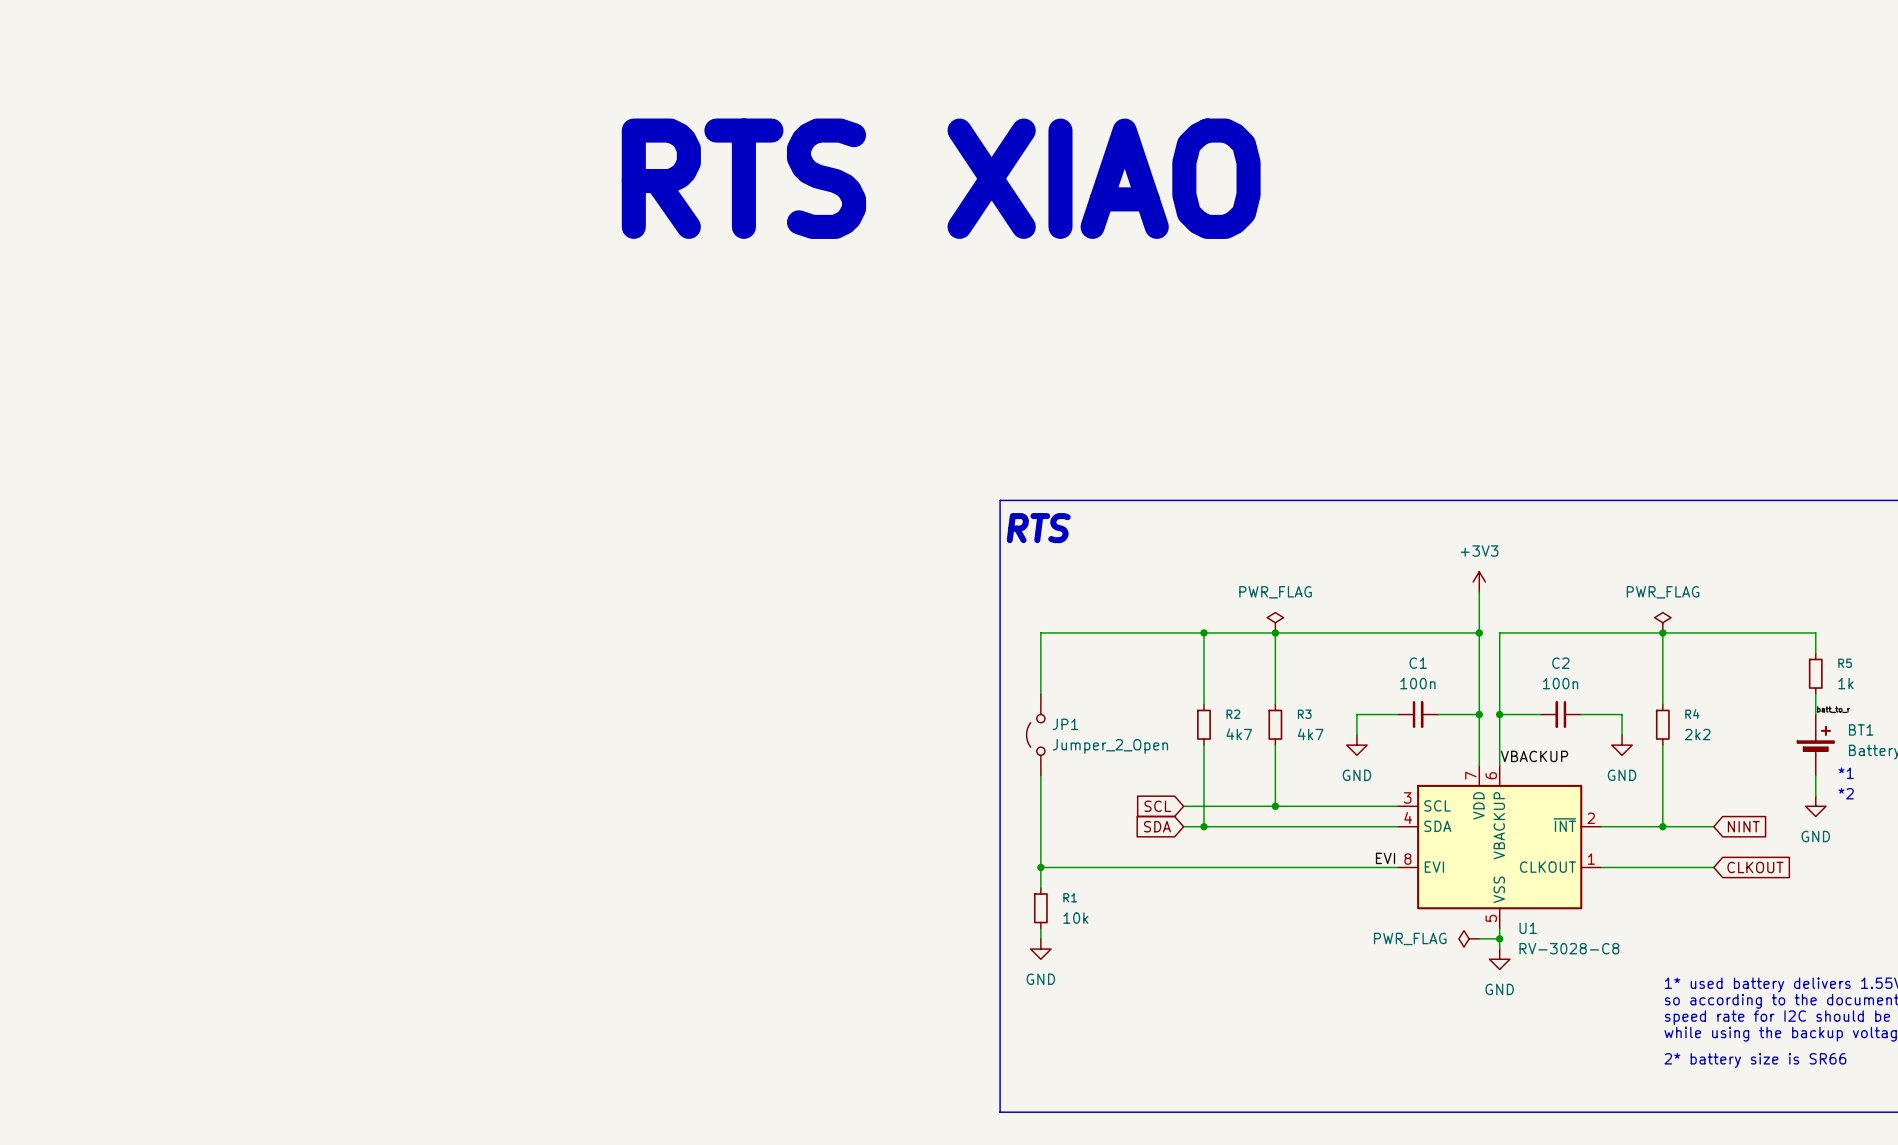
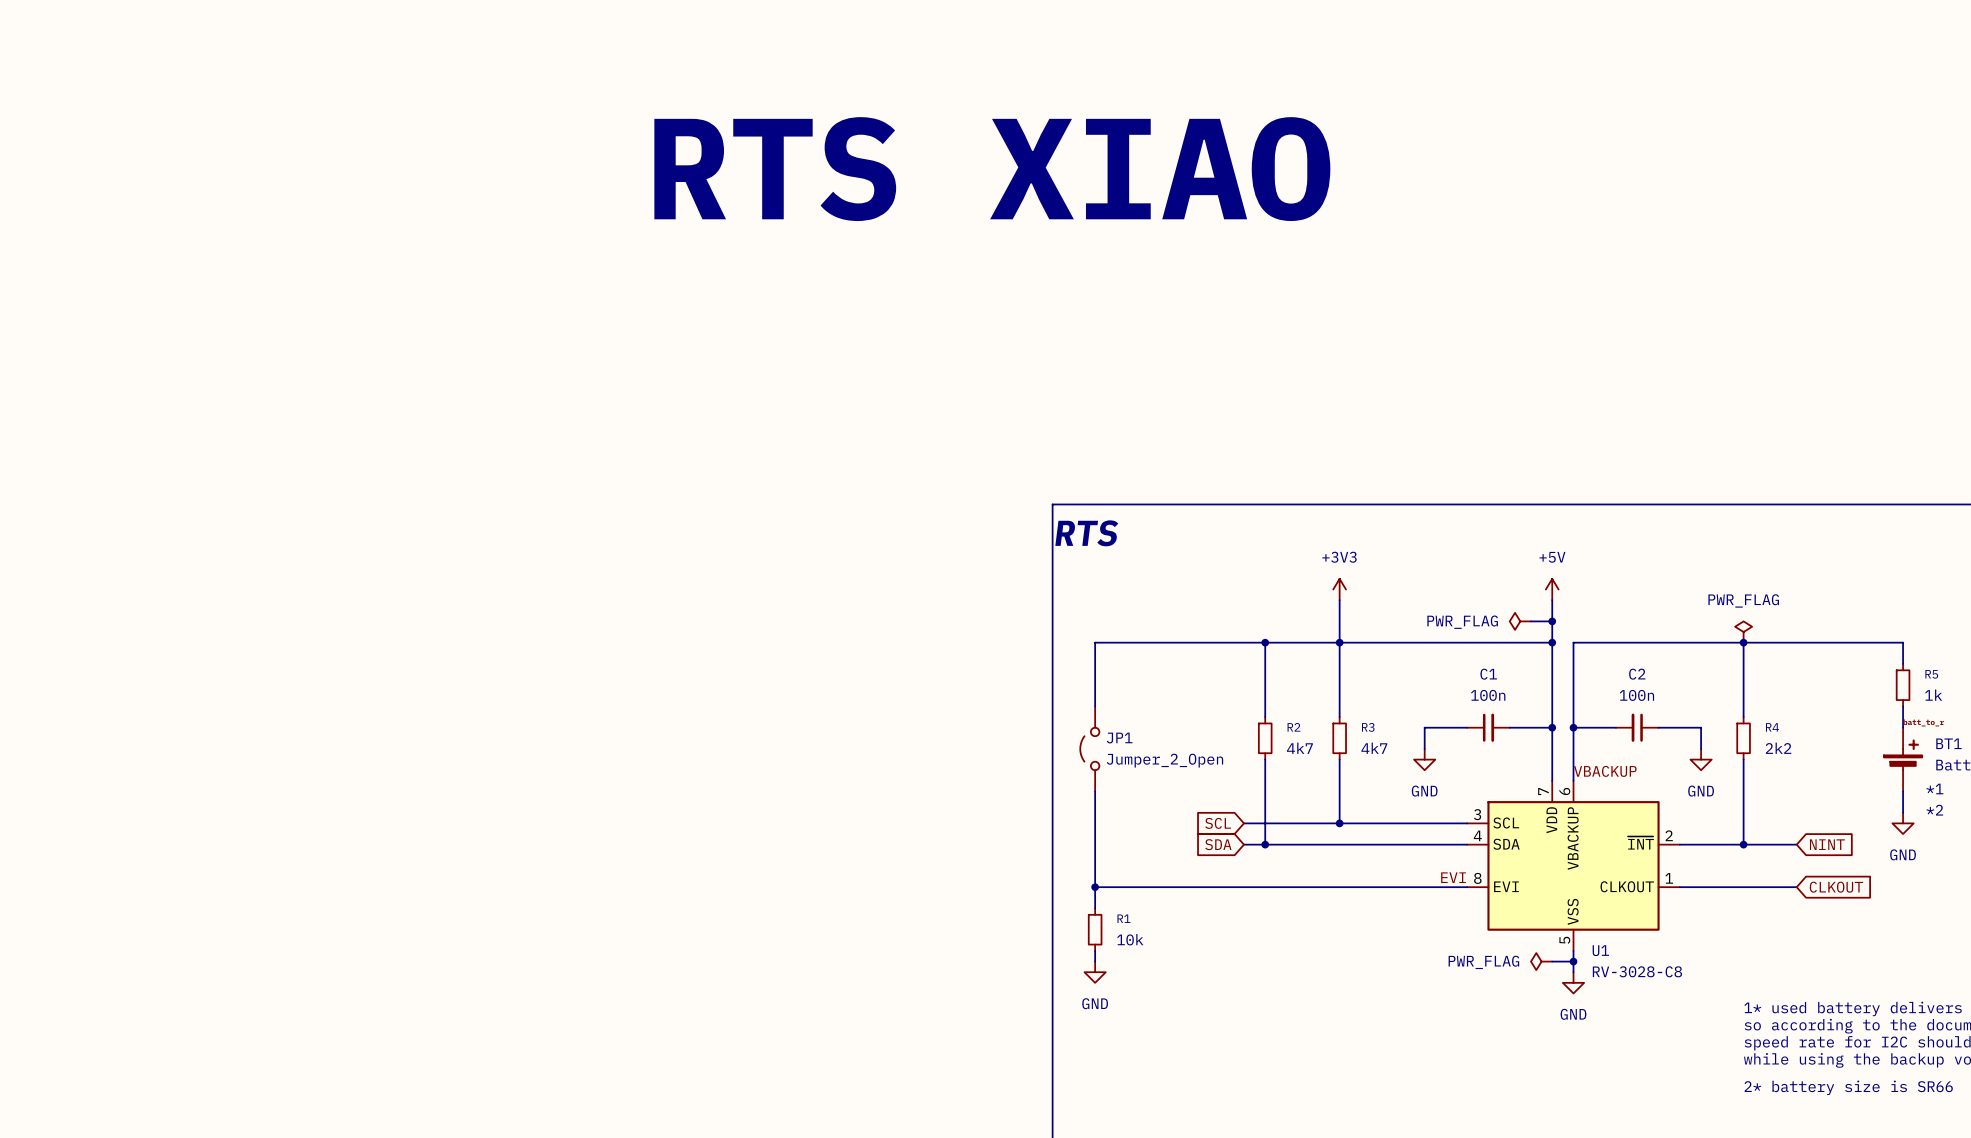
power symbol: none -> +3V3 (1339, 589)
power symbol: +3V3 (1479, 581) -> +5V (1552, 589)
wire: none -> (1339, 600) (1339, 642)
power symbol text position: PWR_FLAG (1275, 592) -> PWR_FLAG (1462, 622)
wire: none -> (1530, 621) (1552, 621)
junction: none -> (1552, 621)
power symbol rotation: 0° (1275, 622) -> 90° counterclockwise (1520, 621)
power symbol position: PWR_FLAG (1275, 622) -> PWR_FLAG (1520, 621)

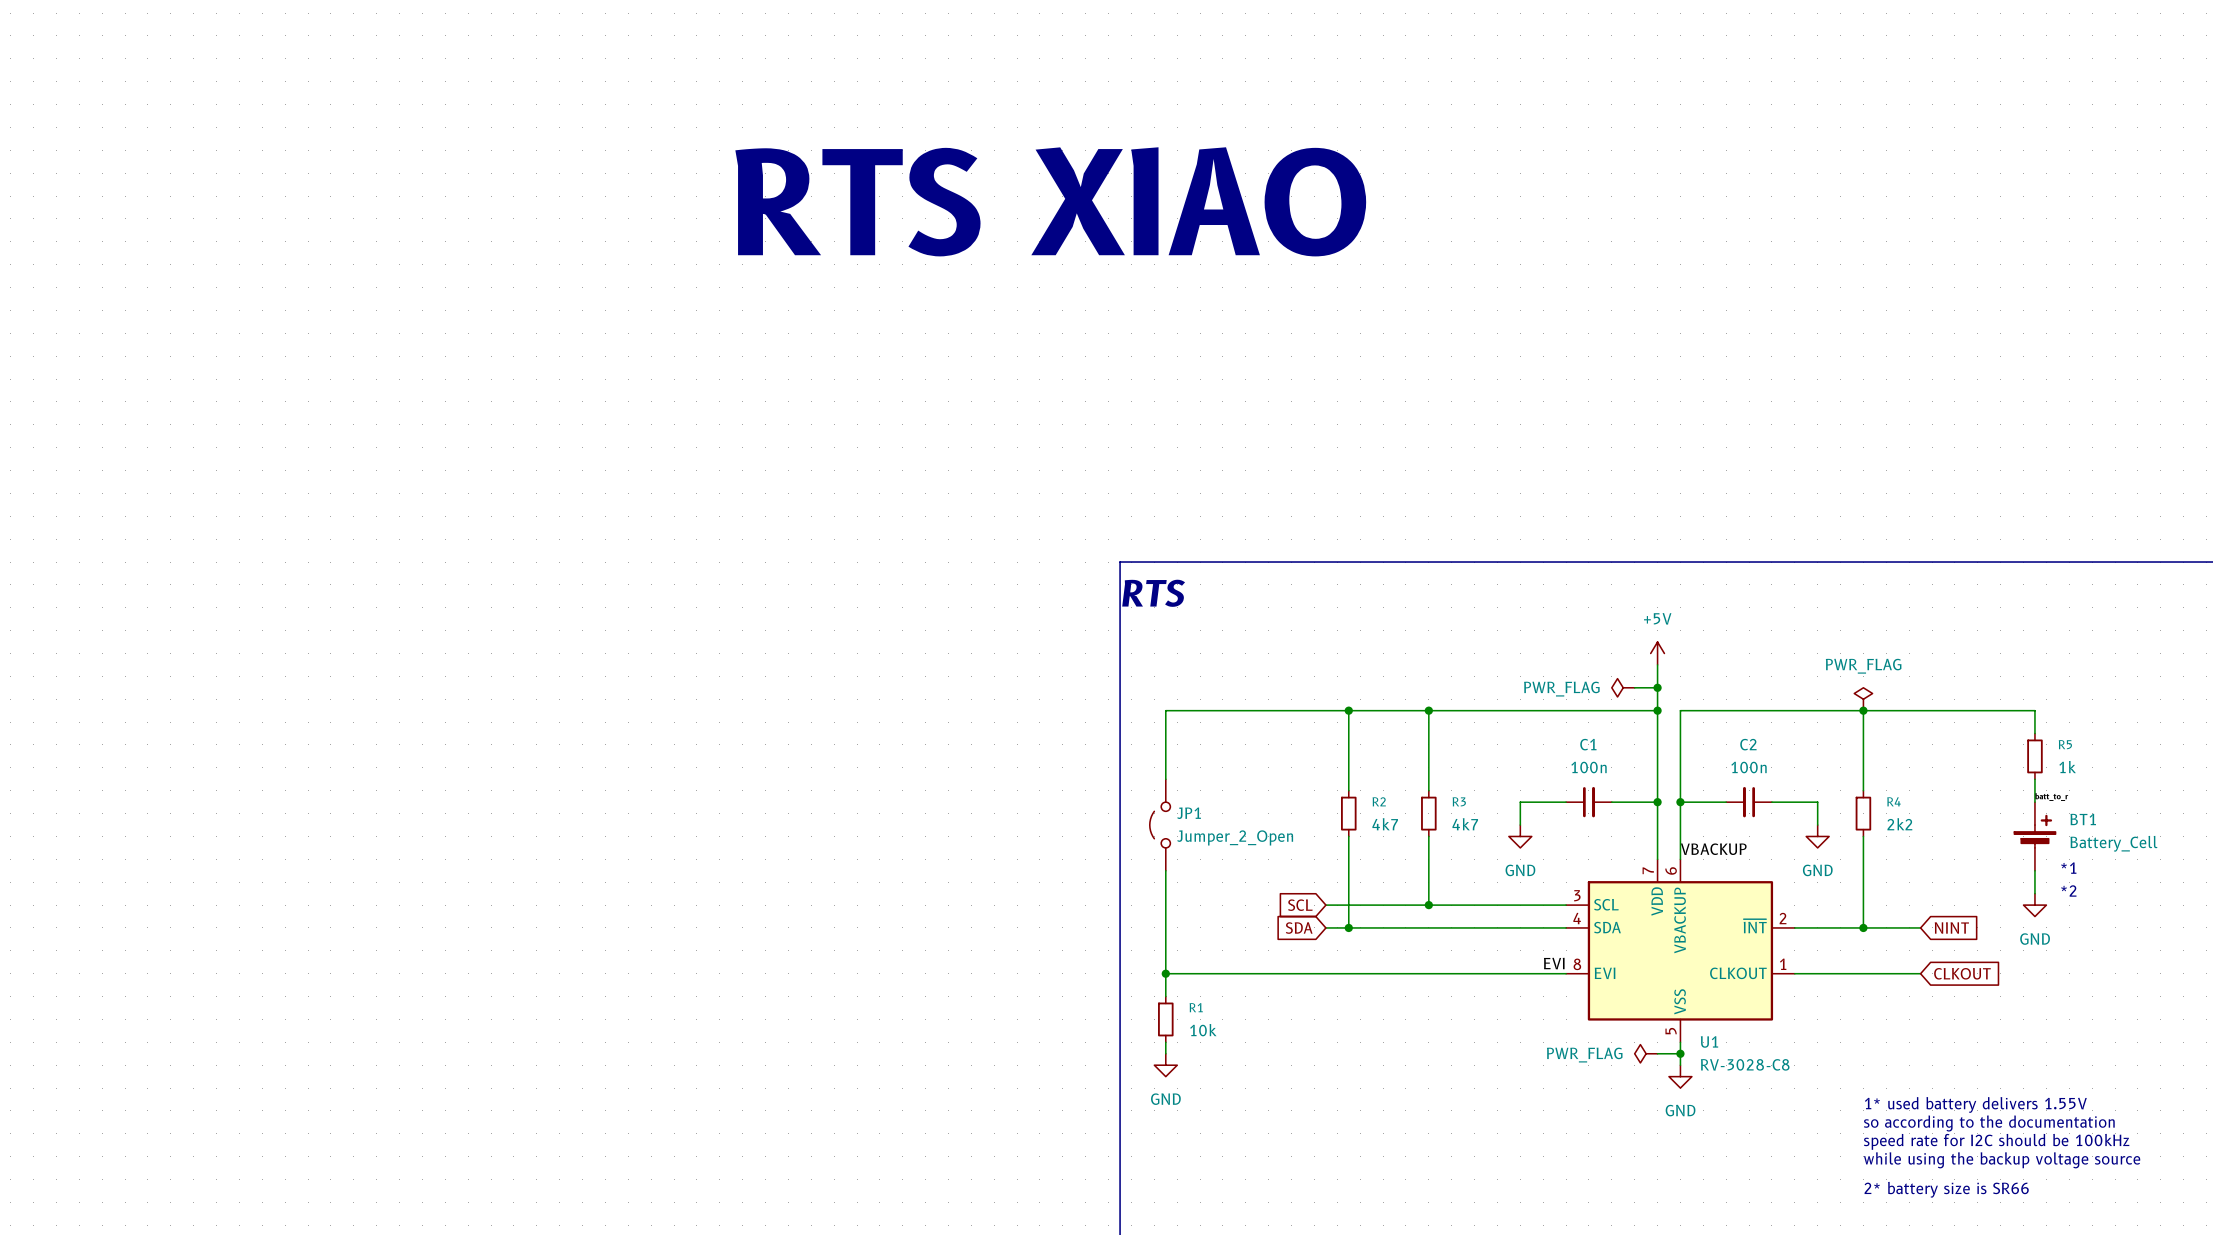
power symbol: +3V3 (1339, 589) -> none
wire: (1339, 600) (1339, 642) -> none

